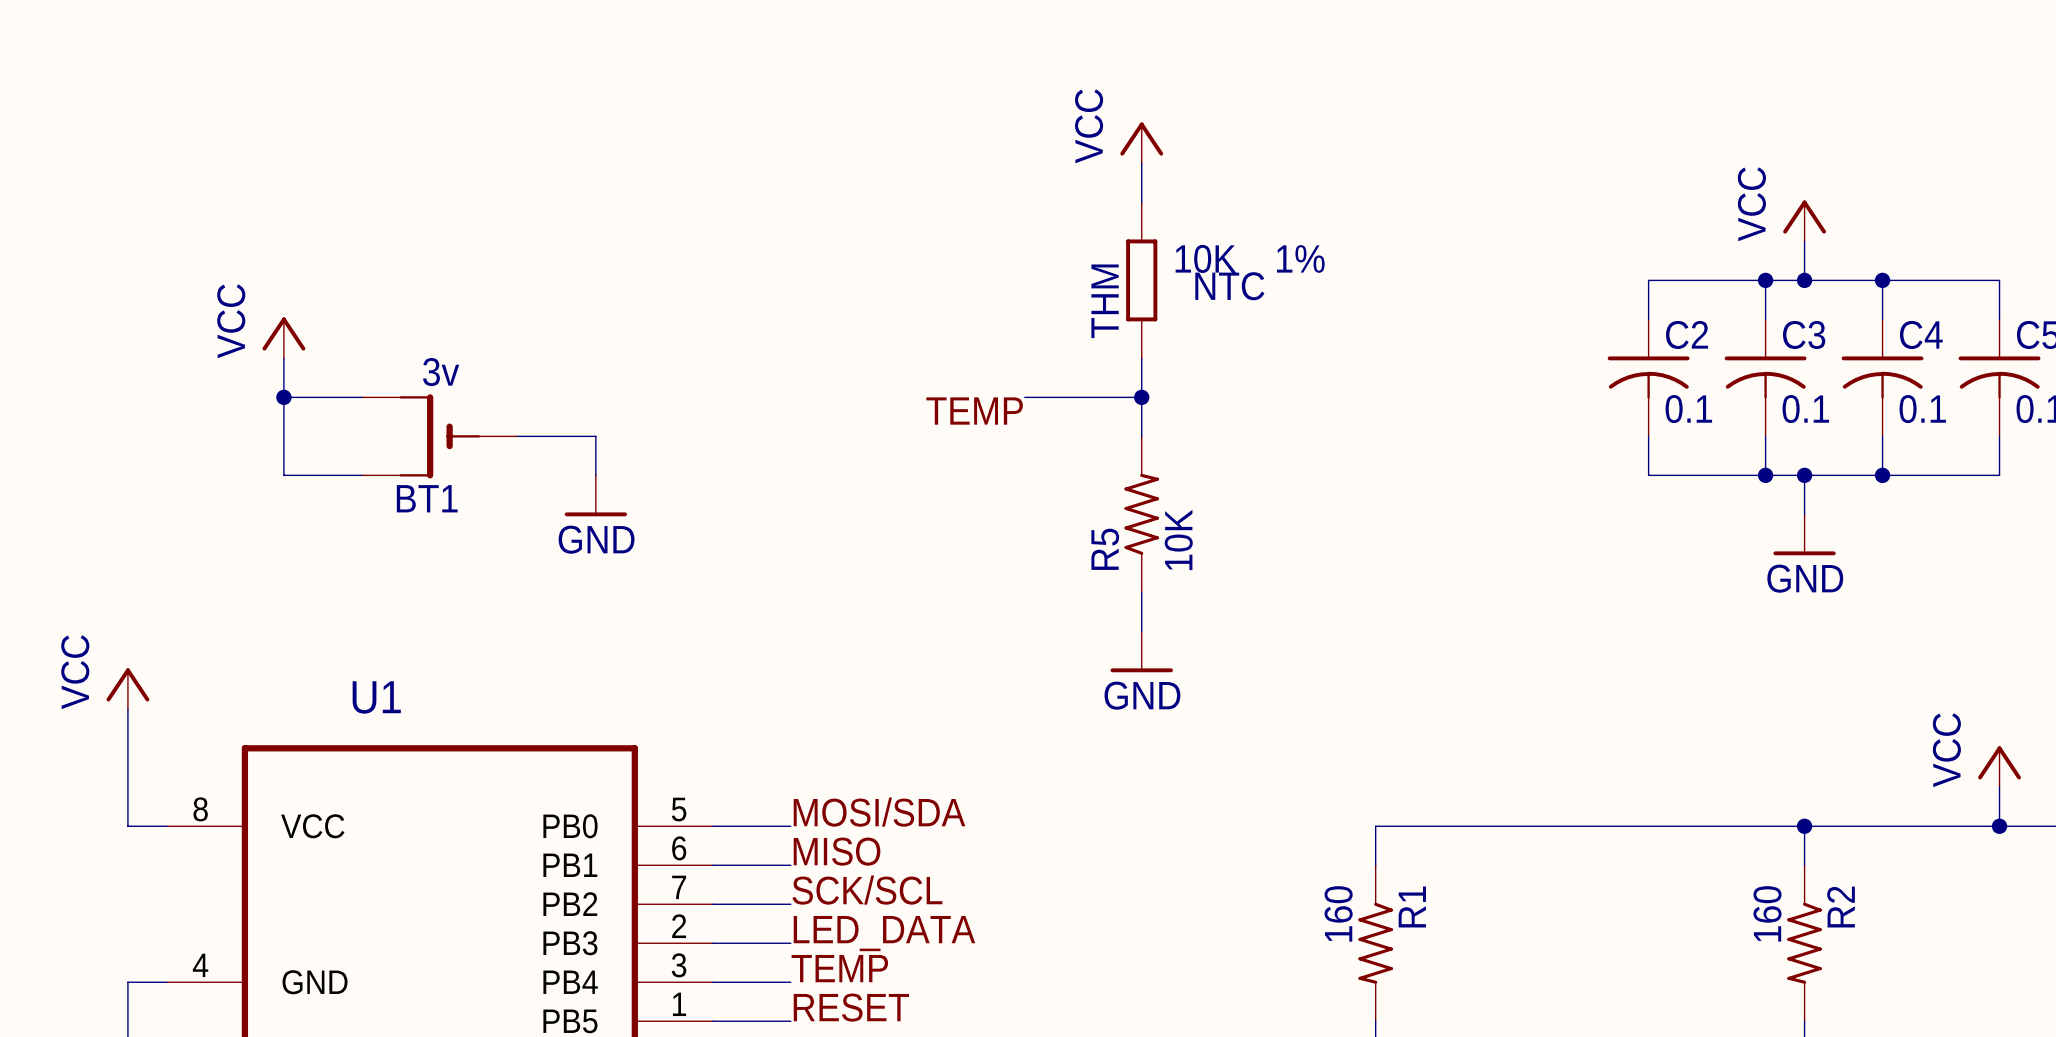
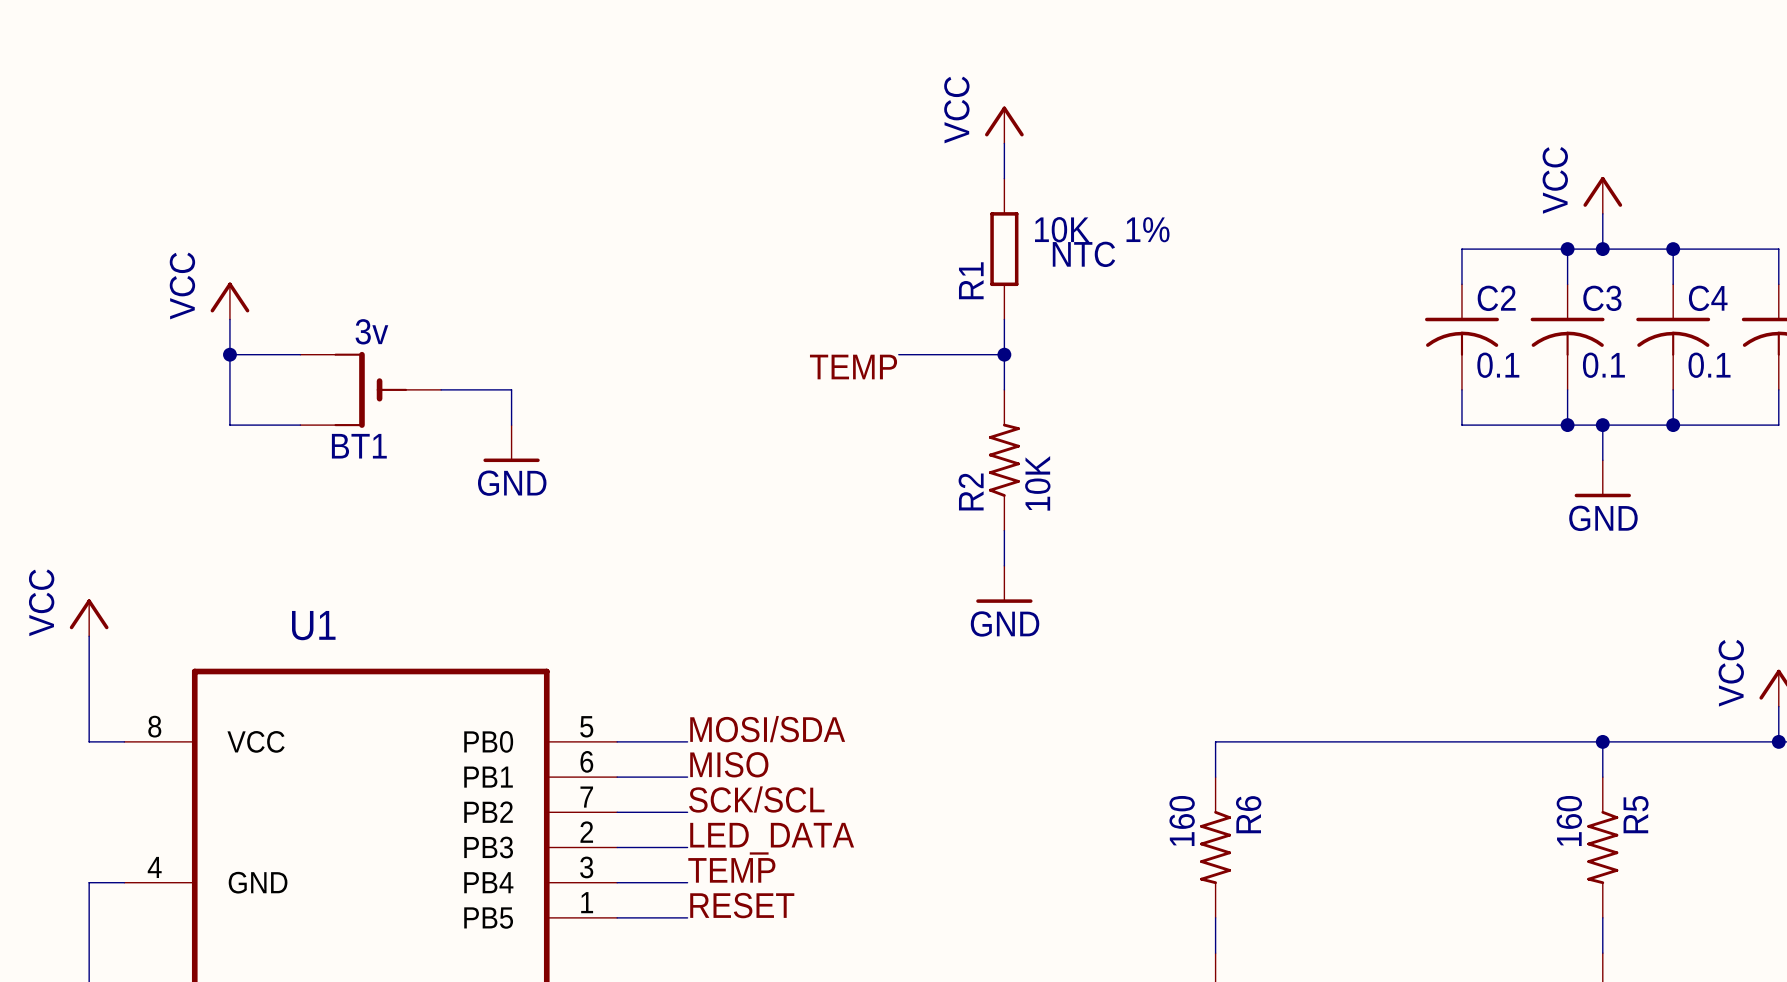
THM name: THM (1105, 301) -> R1 (971, 280)
R5 name: R5 (1105, 549) -> R2 (971, 491)
R1 name: R1 (1412, 907) -> R6 (1248, 814)
R2 name: R2 (1841, 907) -> R5 (1636, 814)

